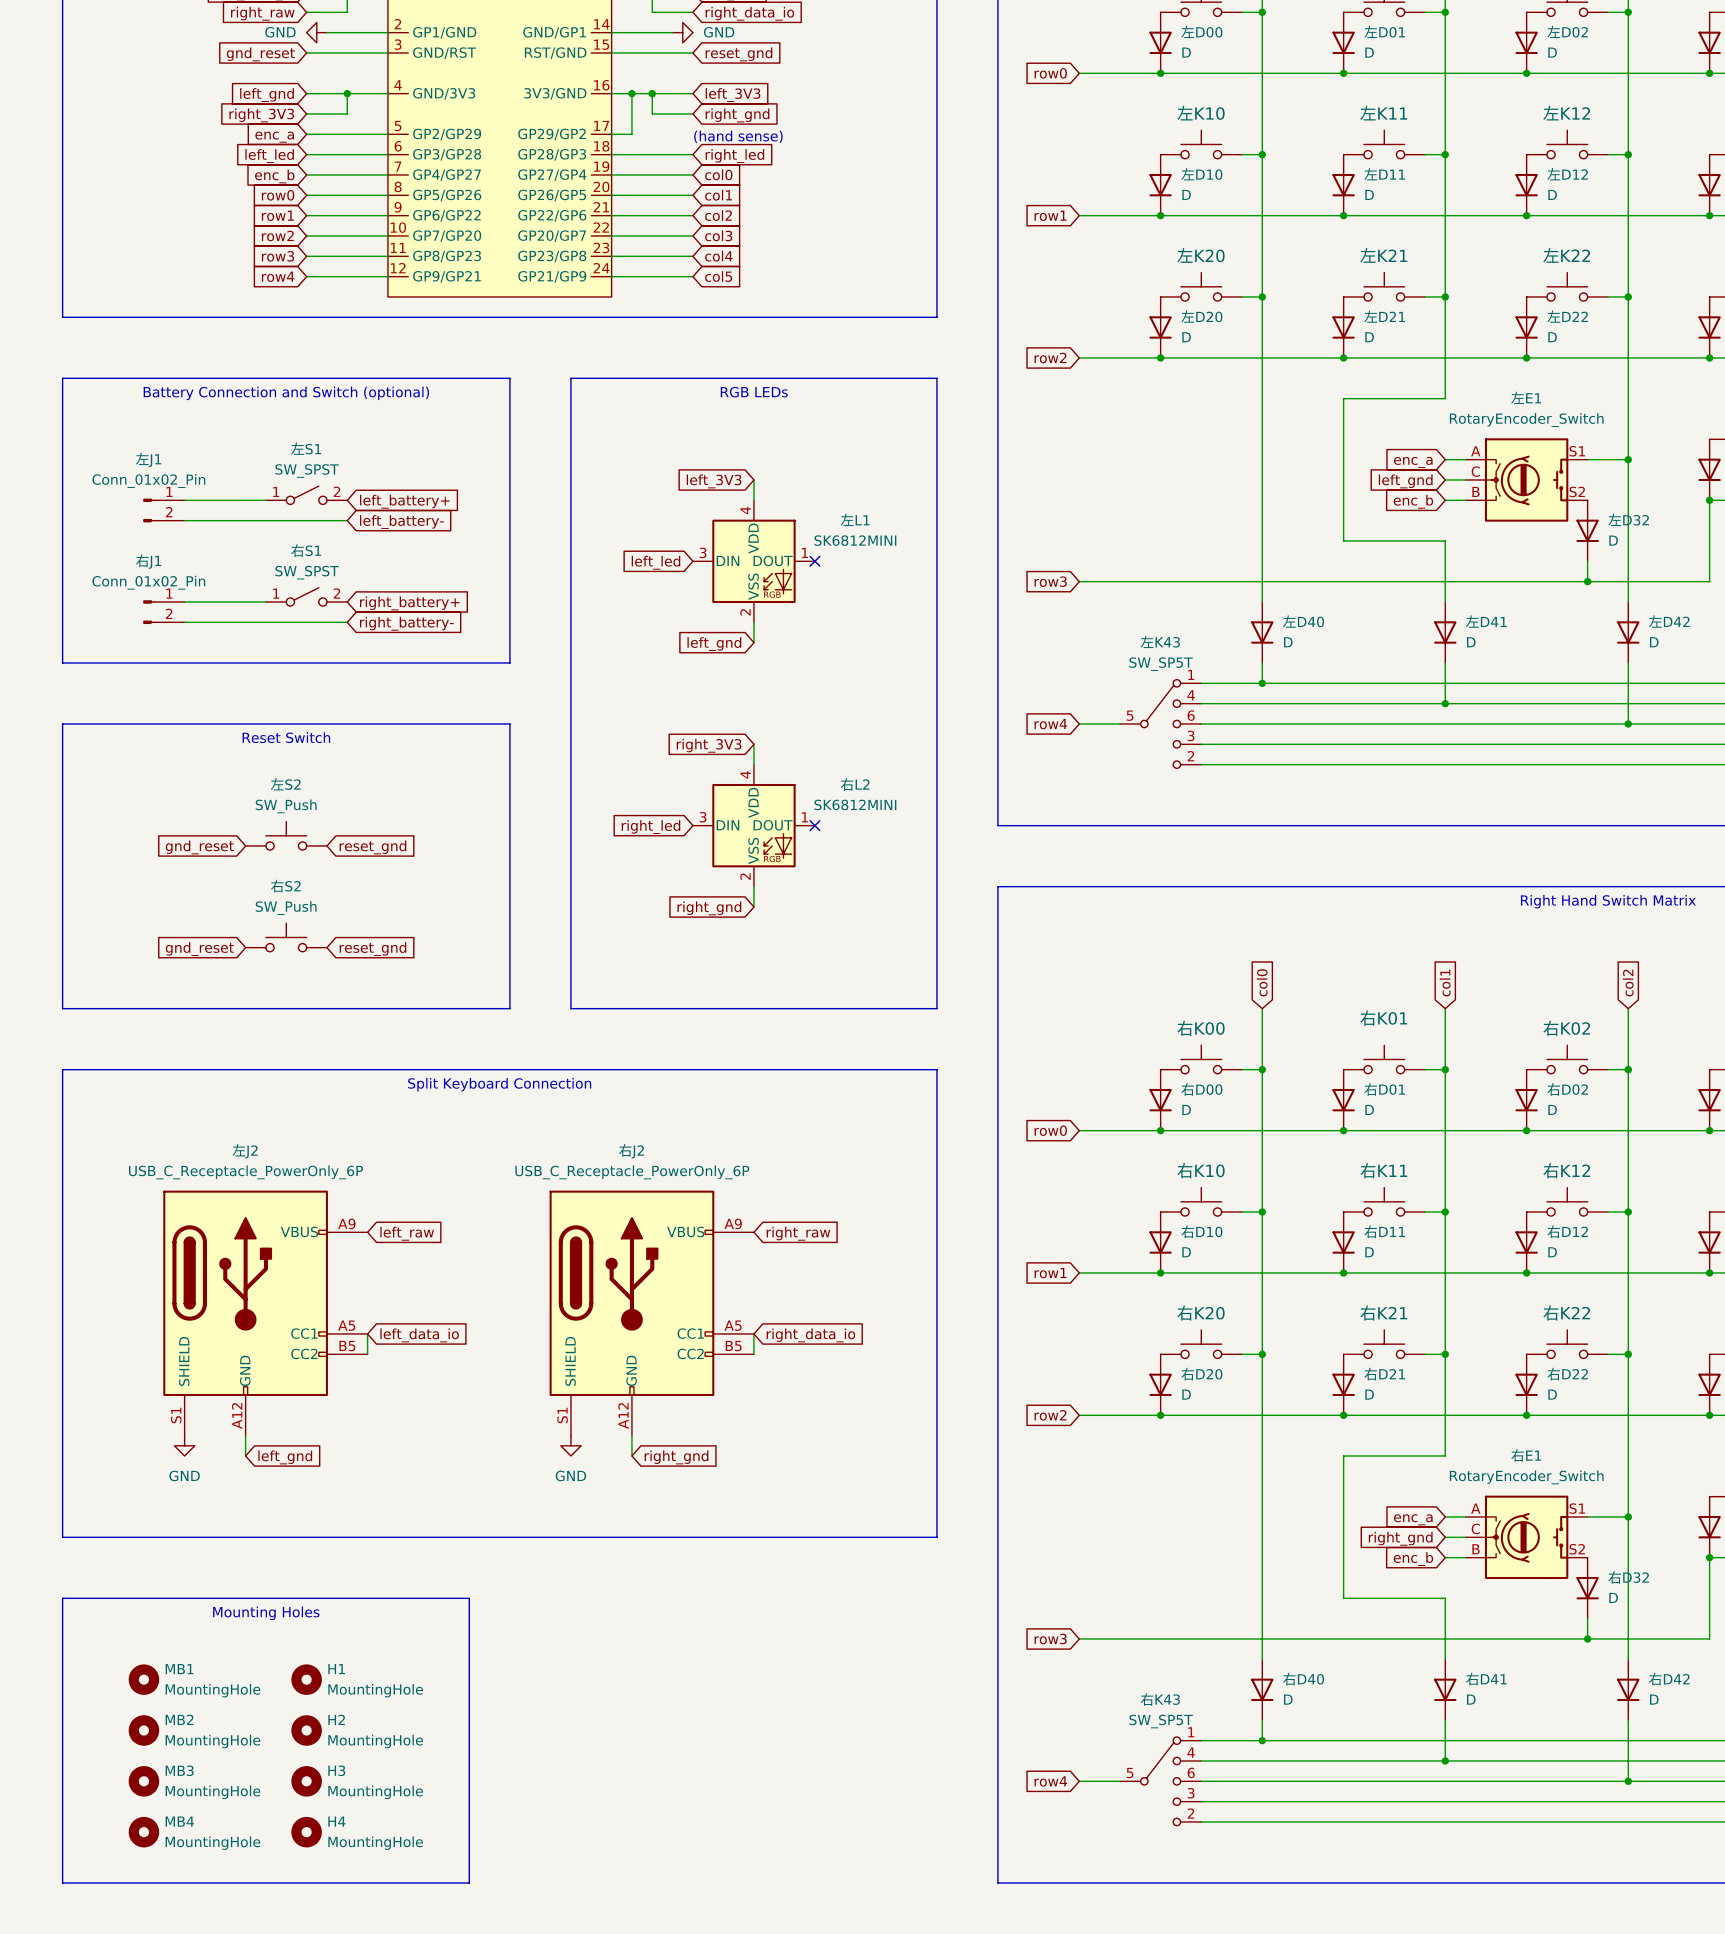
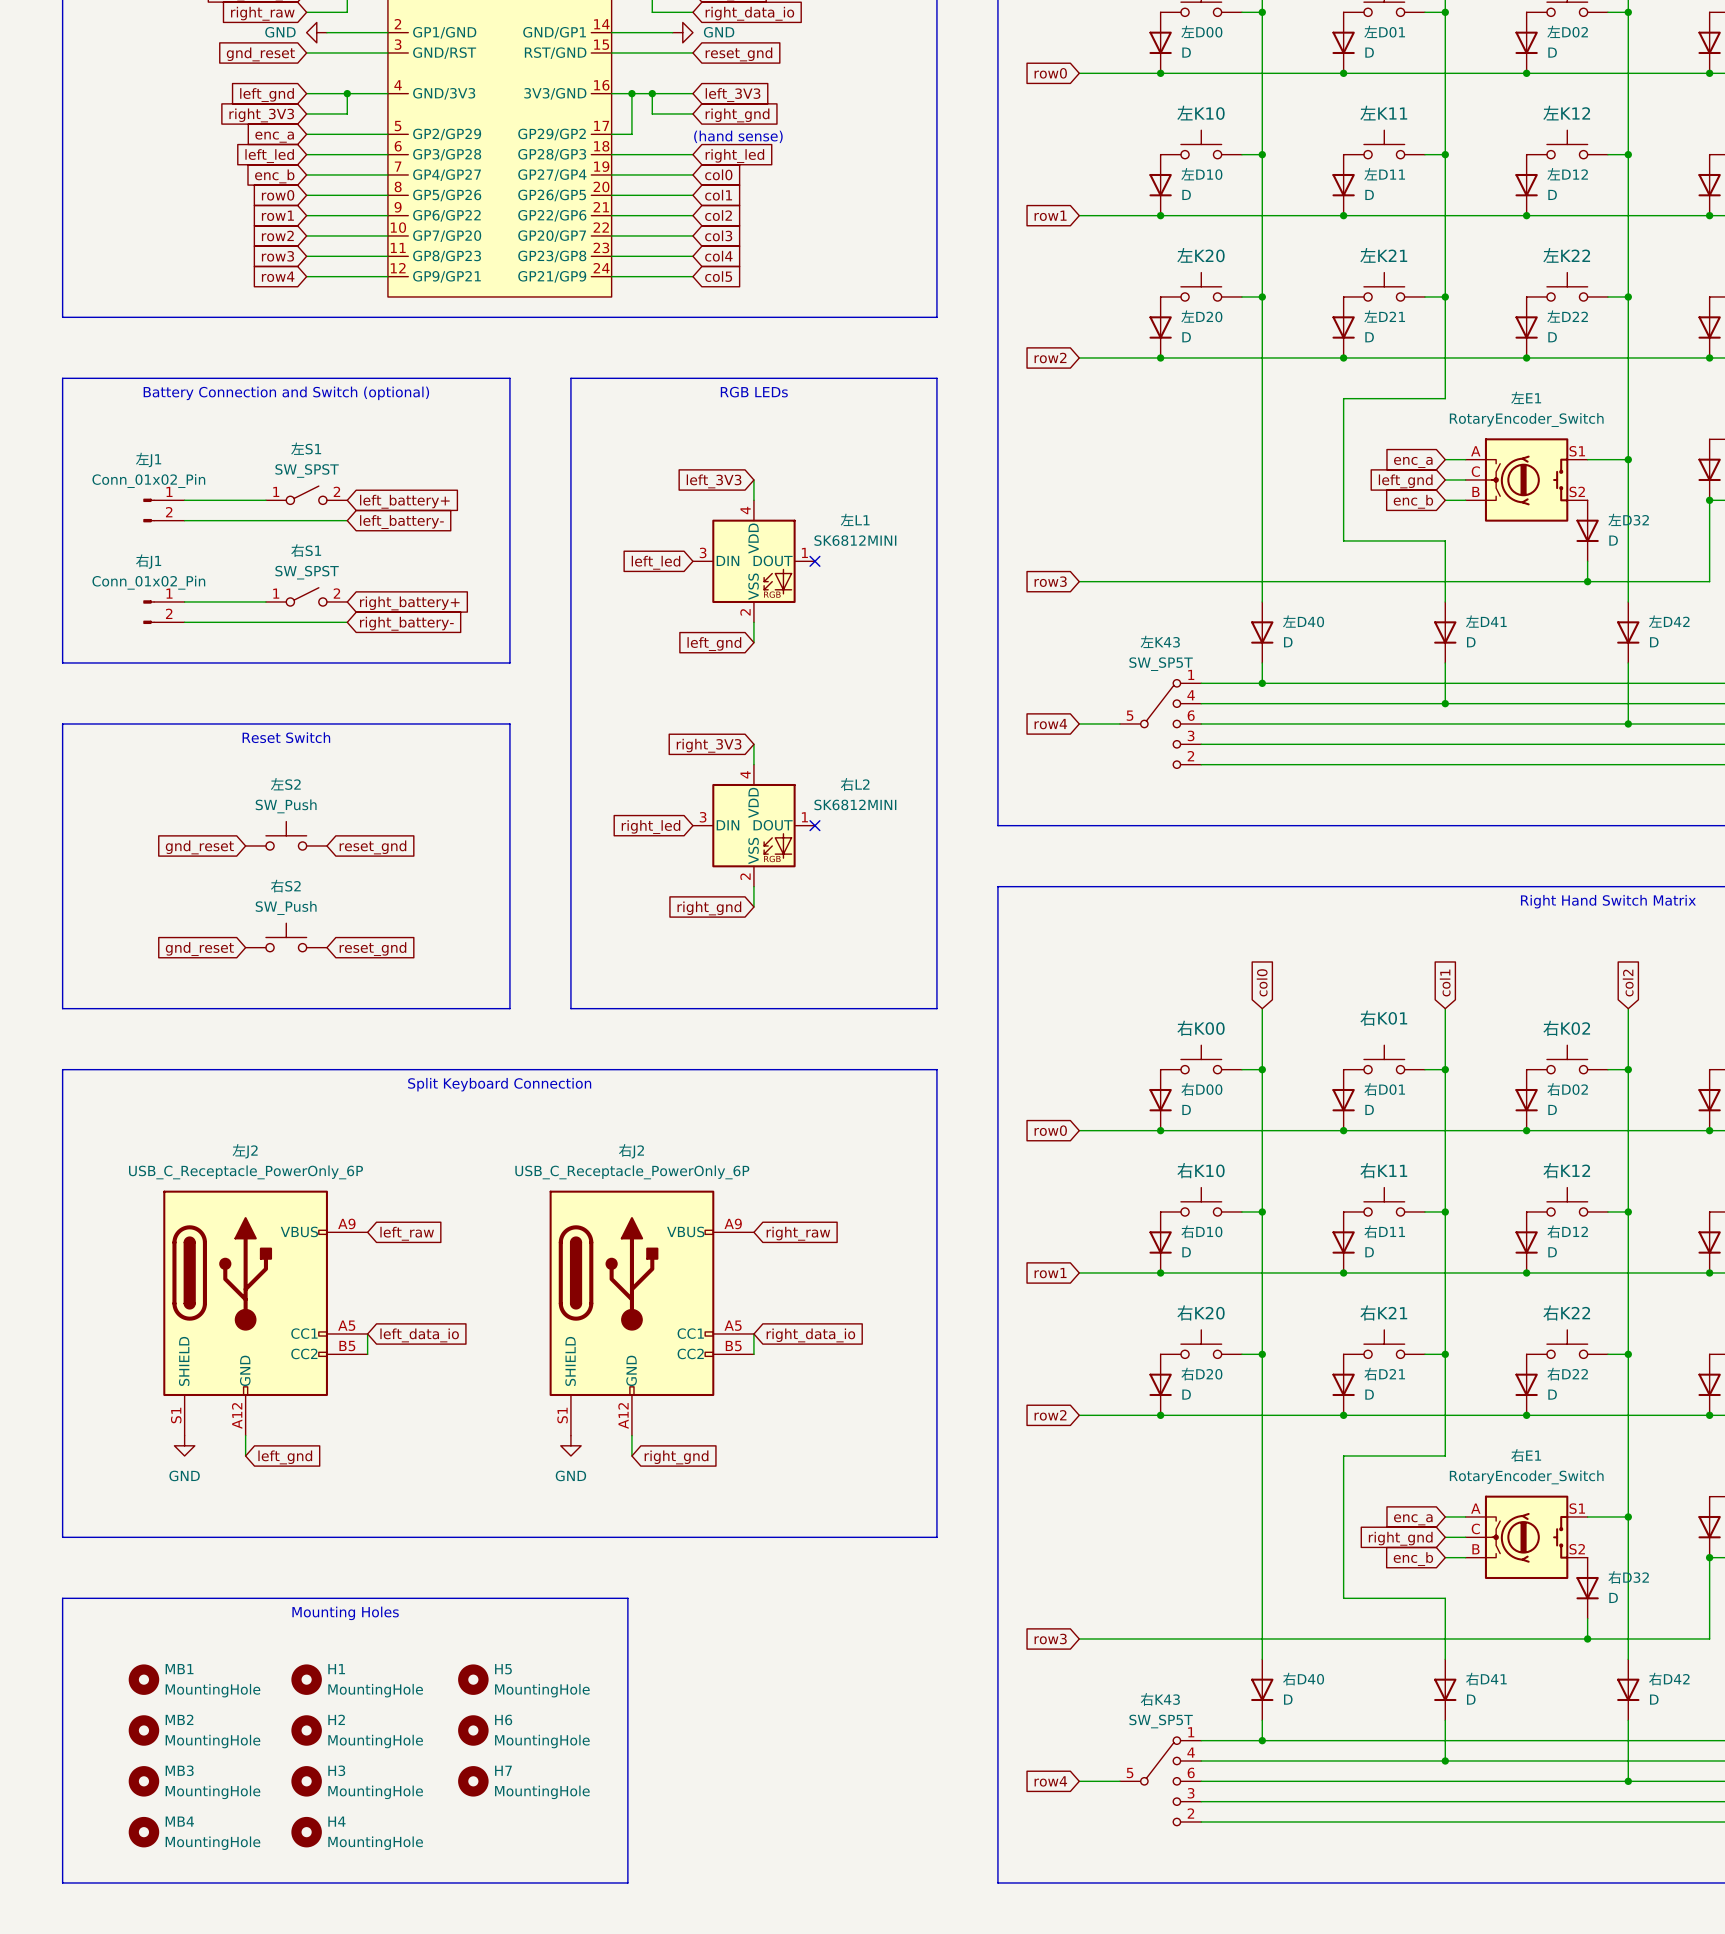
line: (469, 1598) (469, 1882) -> (469, 1598) (627, 1598) (627, 1882) (469, 1882)
text position: Mounting Holes (266, 1613) -> Mounting Holes (345, 1613)
H5: none -> MountingHole (473, 1679)
H6: none -> MountingHole (473, 1730)
H7: none -> MountingHole (473, 1781)

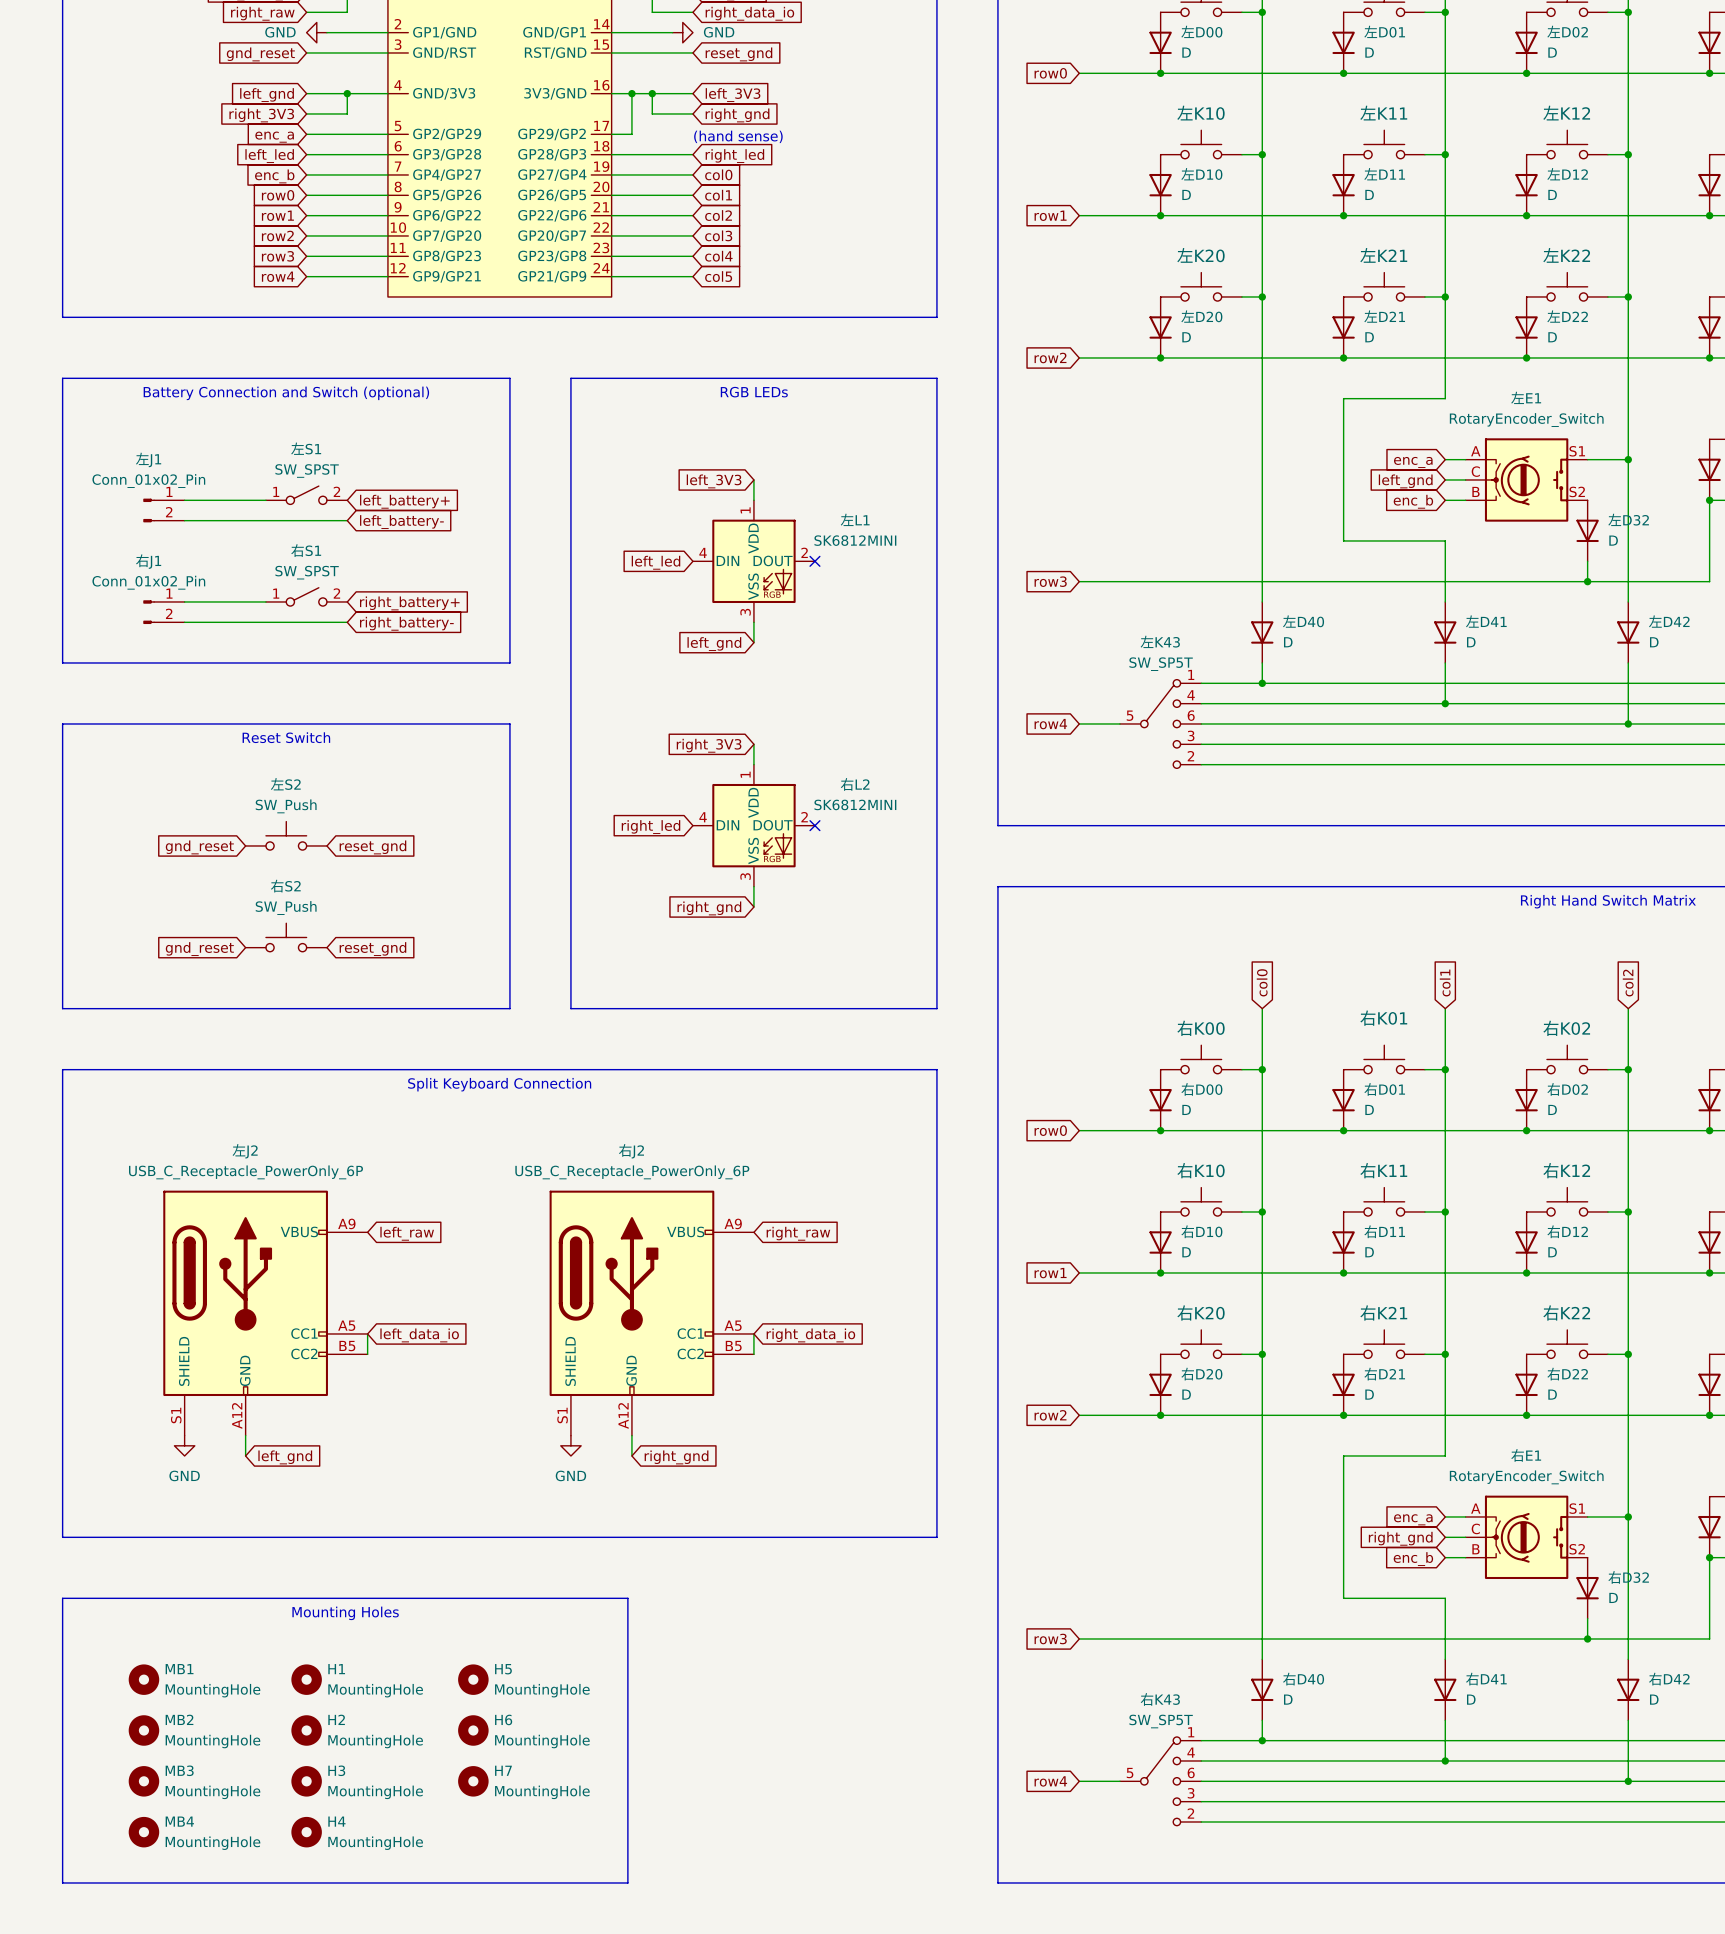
左L1 pin number: 4 (745, 510) -> 1 (745, 510)
左L1 pin number: 3 (703, 552) -> 4 (703, 552)
左L1 pin number: 1 (804, 552) -> 2 (804, 552)
左L1 pin number: 2 (745, 612) -> 3 (745, 612)
右L2 pin number: 4 (745, 774) -> 1 (745, 774)
右L2 pin number: 3 (703, 817) -> 4 (703, 817)
右L2 pin number: 1 (804, 817) -> 2 (804, 817)
右L2 pin number: 2 (745, 876) -> 3 (745, 876)

